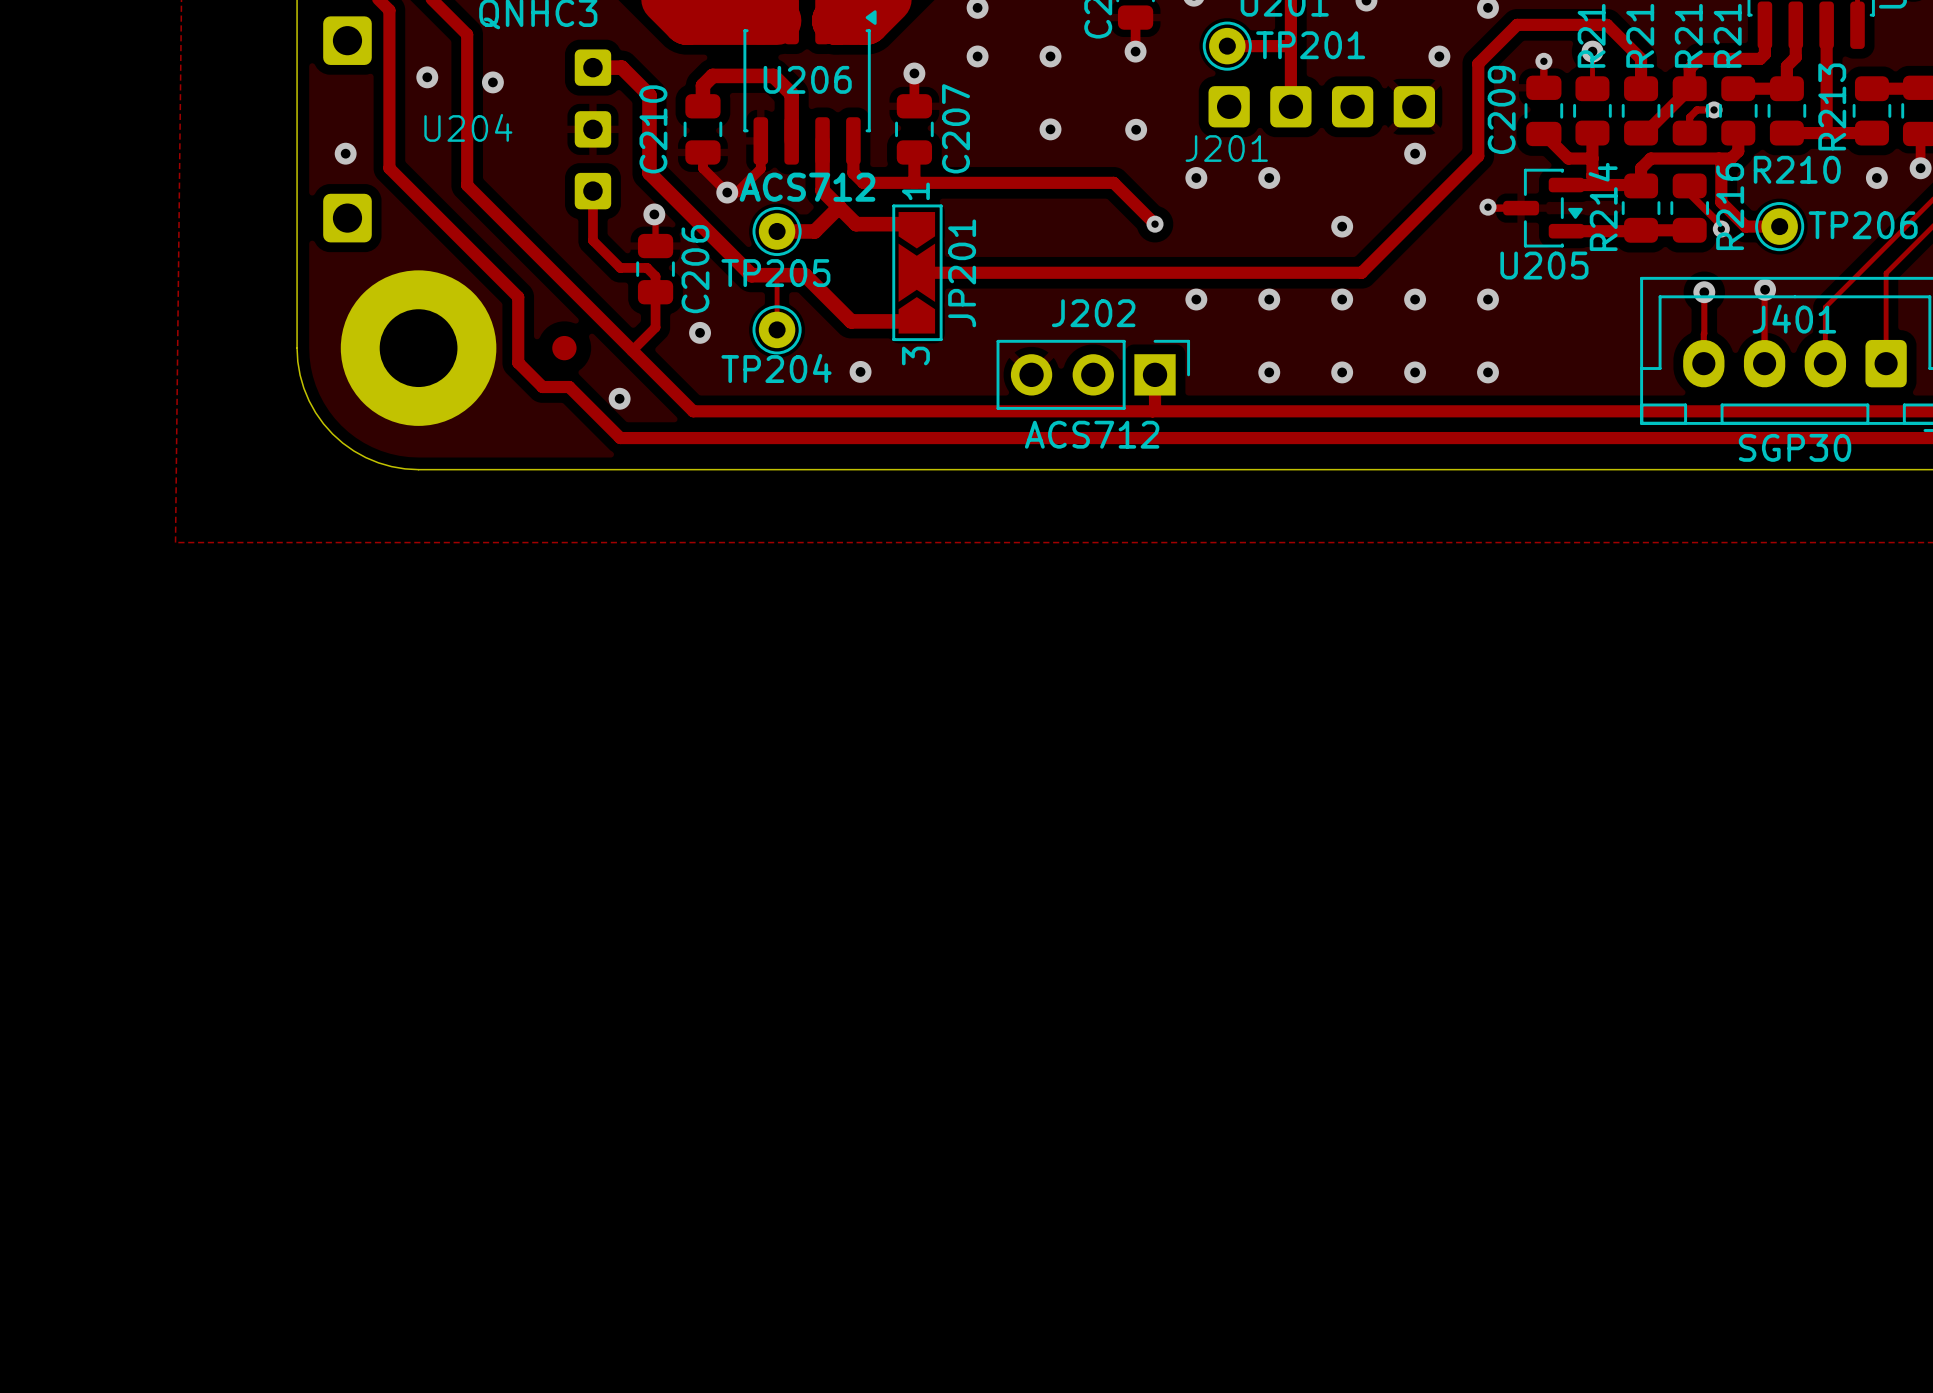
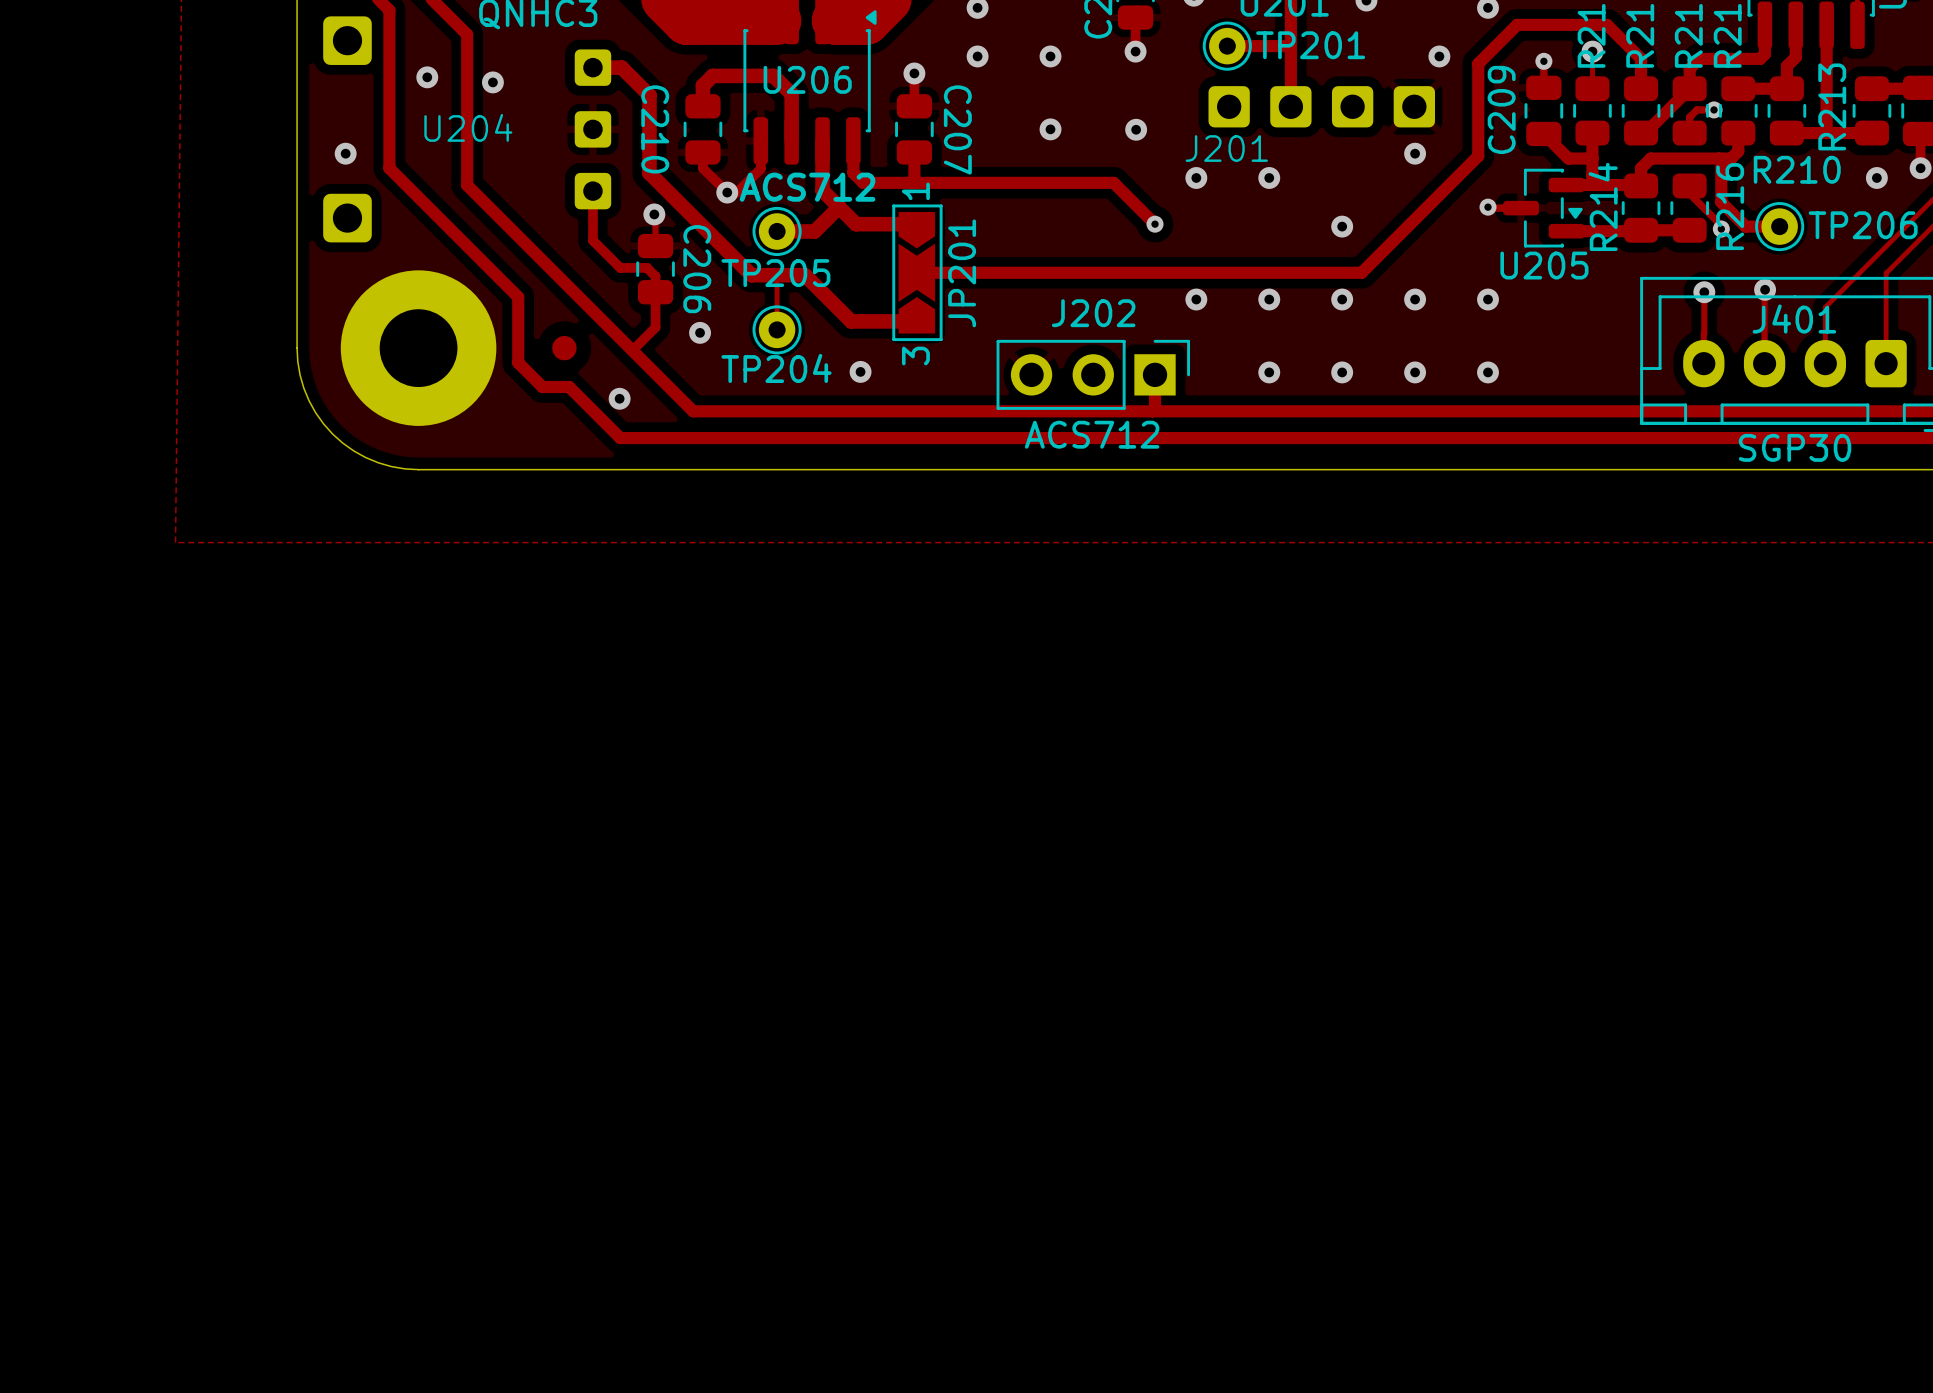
C207 name rotation: 0° (956, 128) -> 180° (957, 129)
C210 name rotation: 0° (653, 129) -> 180° (655, 129)
C206 name rotation: 0° (695, 269) -> 180° (697, 269)

